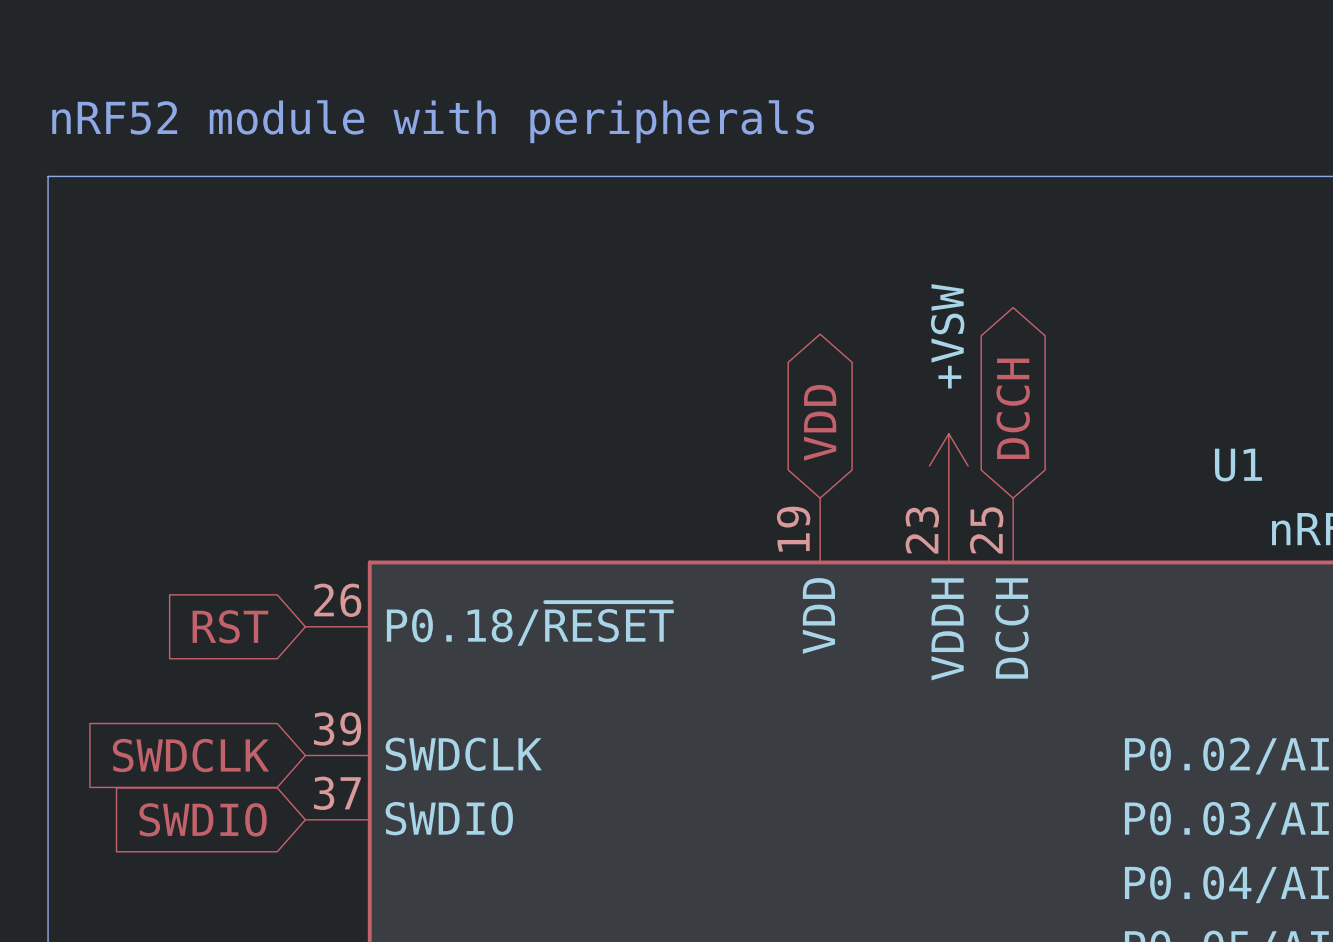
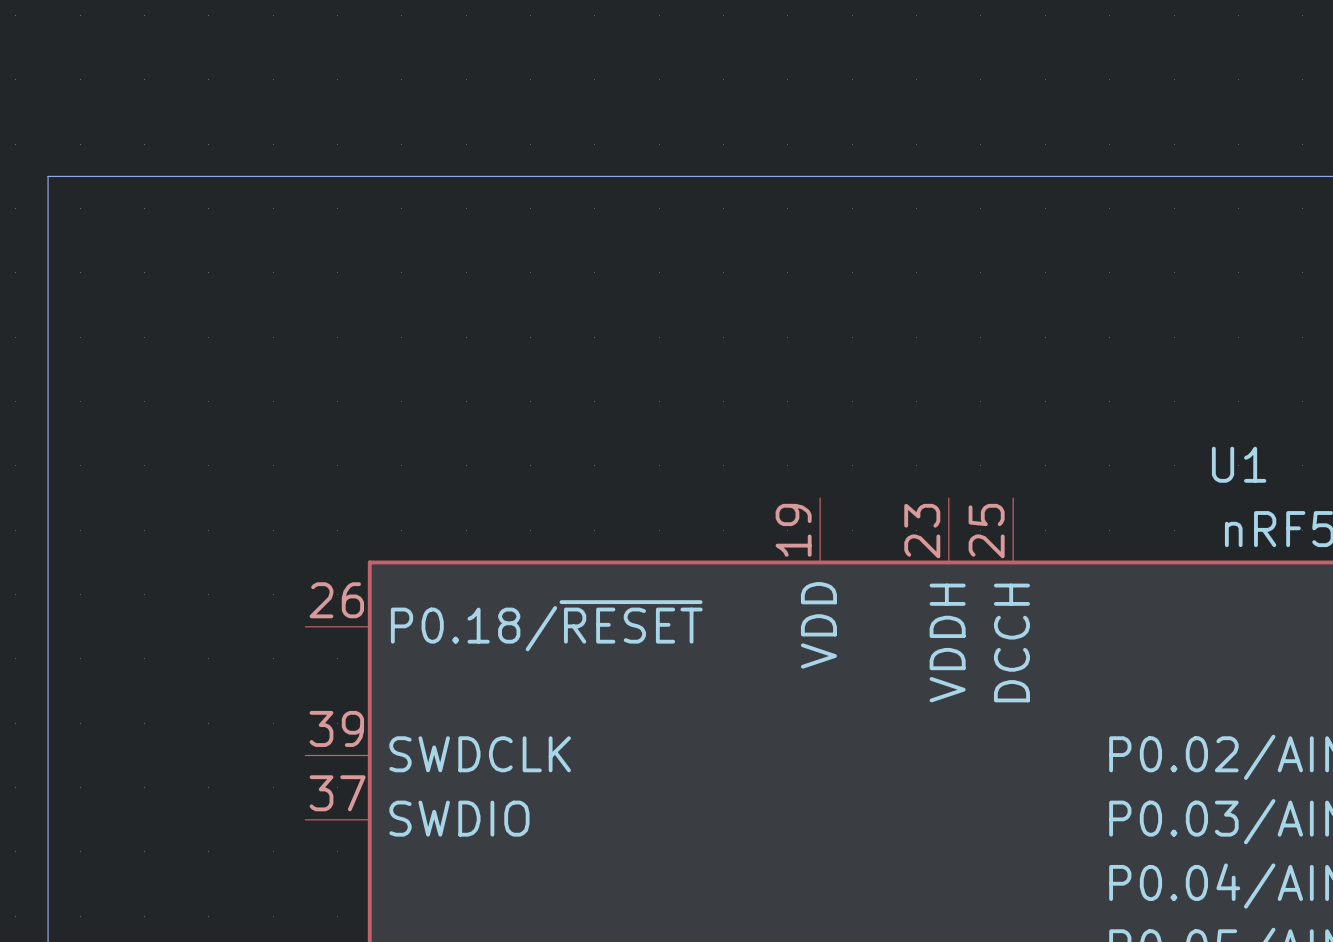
text: nRF52 module with peripherals (433, 121) -> none
global label: DCCH (1013, 408) -> none
global label: VDD (820, 422) -> none
power symbol: +VSW (948, 465) -> none
global label: RST (230, 626) -> none
global label: SWDCLK (190, 755) -> none
global label: SWDIO (203, 819) -> none

